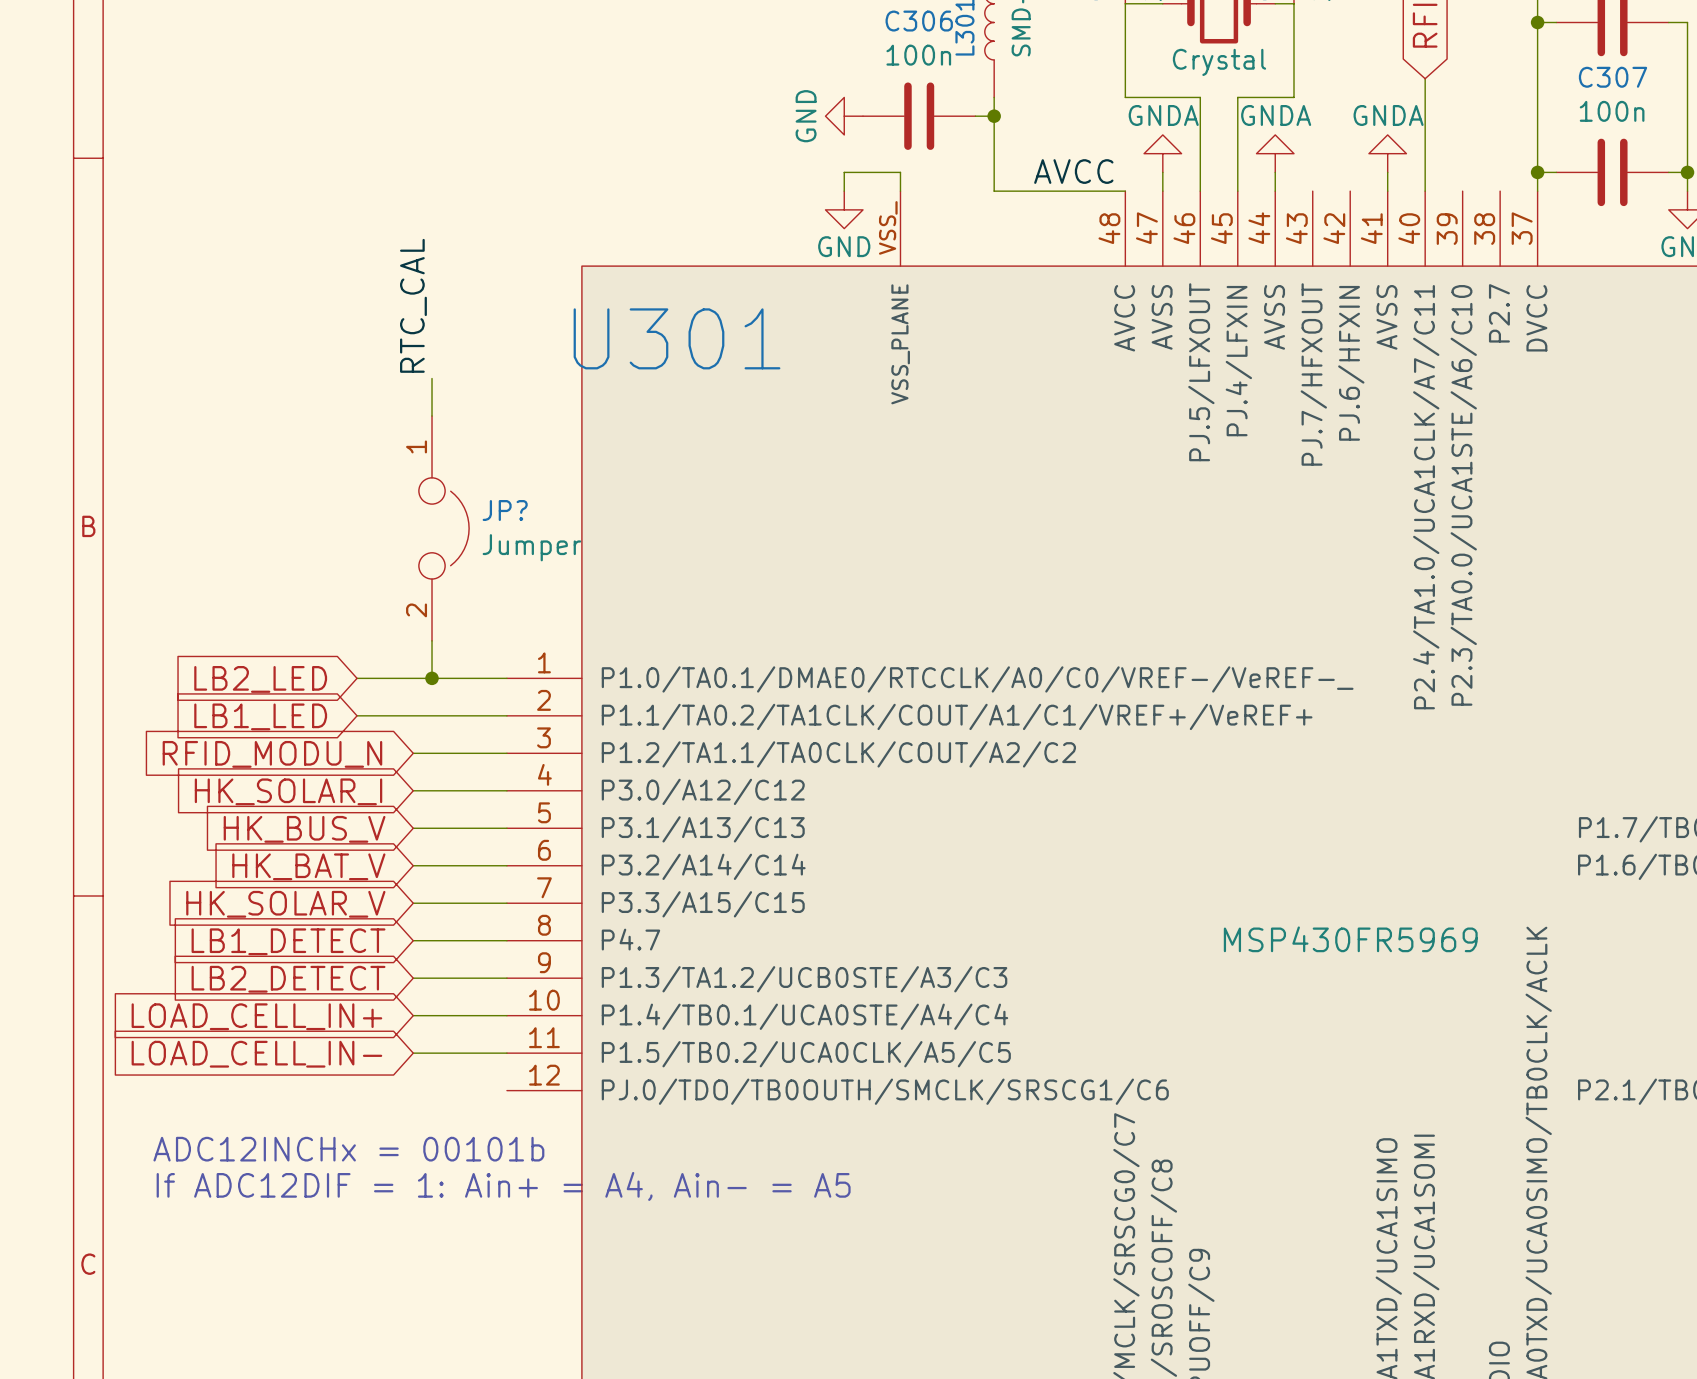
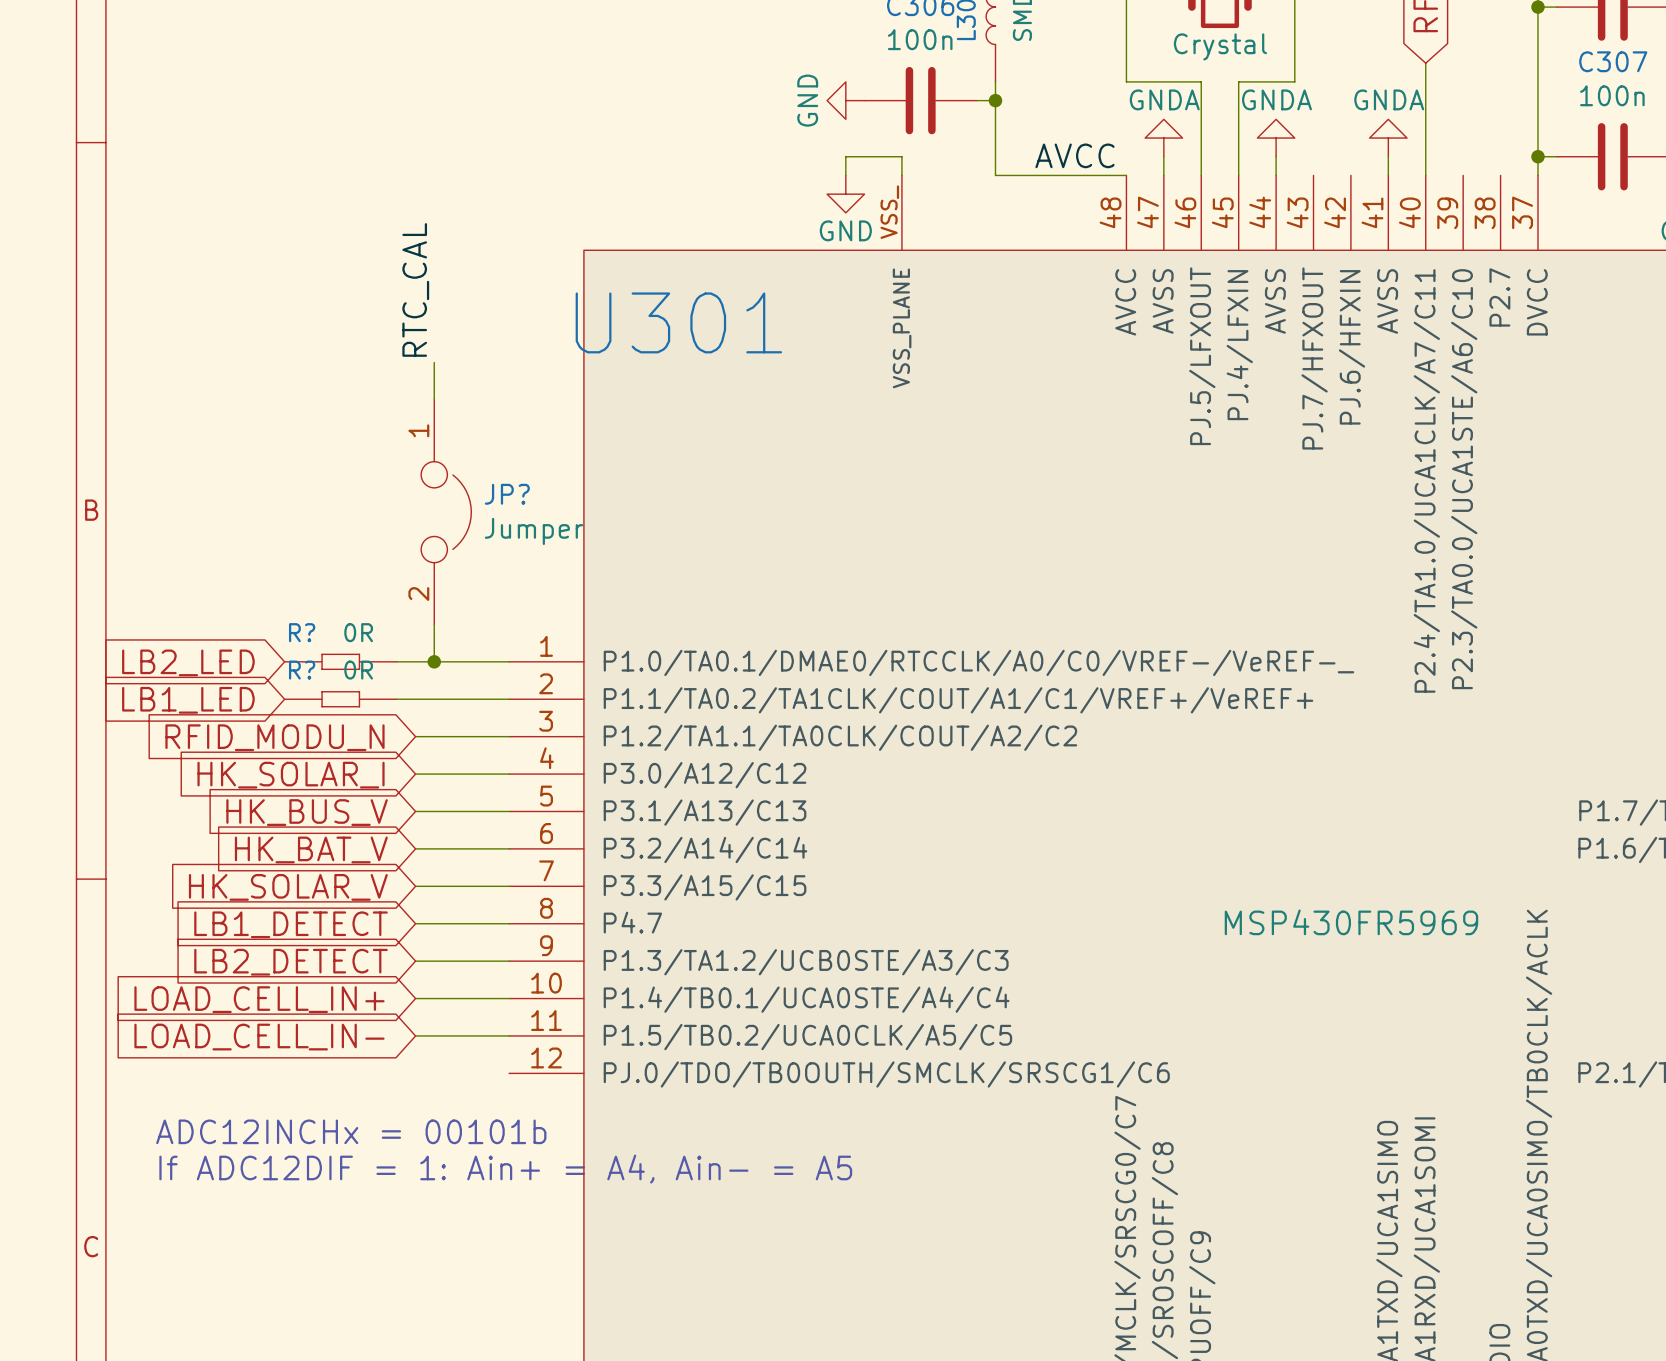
R?: none -> 0R (340, 661)
global label position: LB2_LED (260, 679) -> LB2_LED (188, 662)
R?: none -> 0R (340, 699)
global label position: LB1_LED (260, 716) -> LB1_LED (188, 700)

